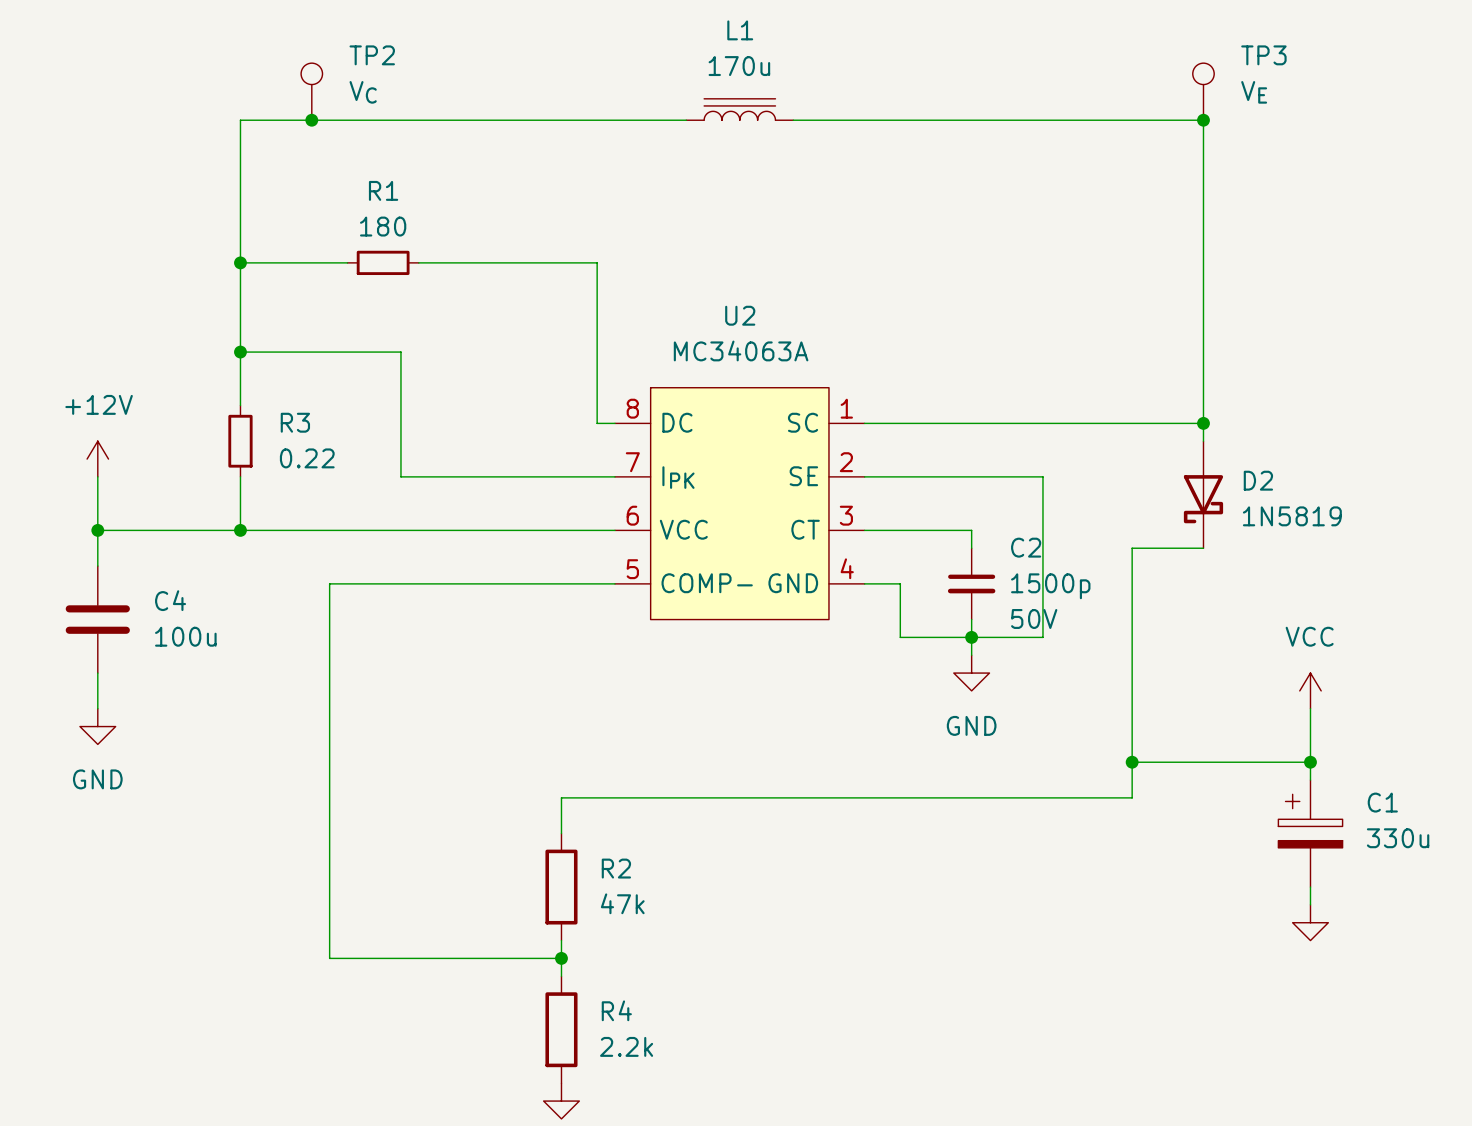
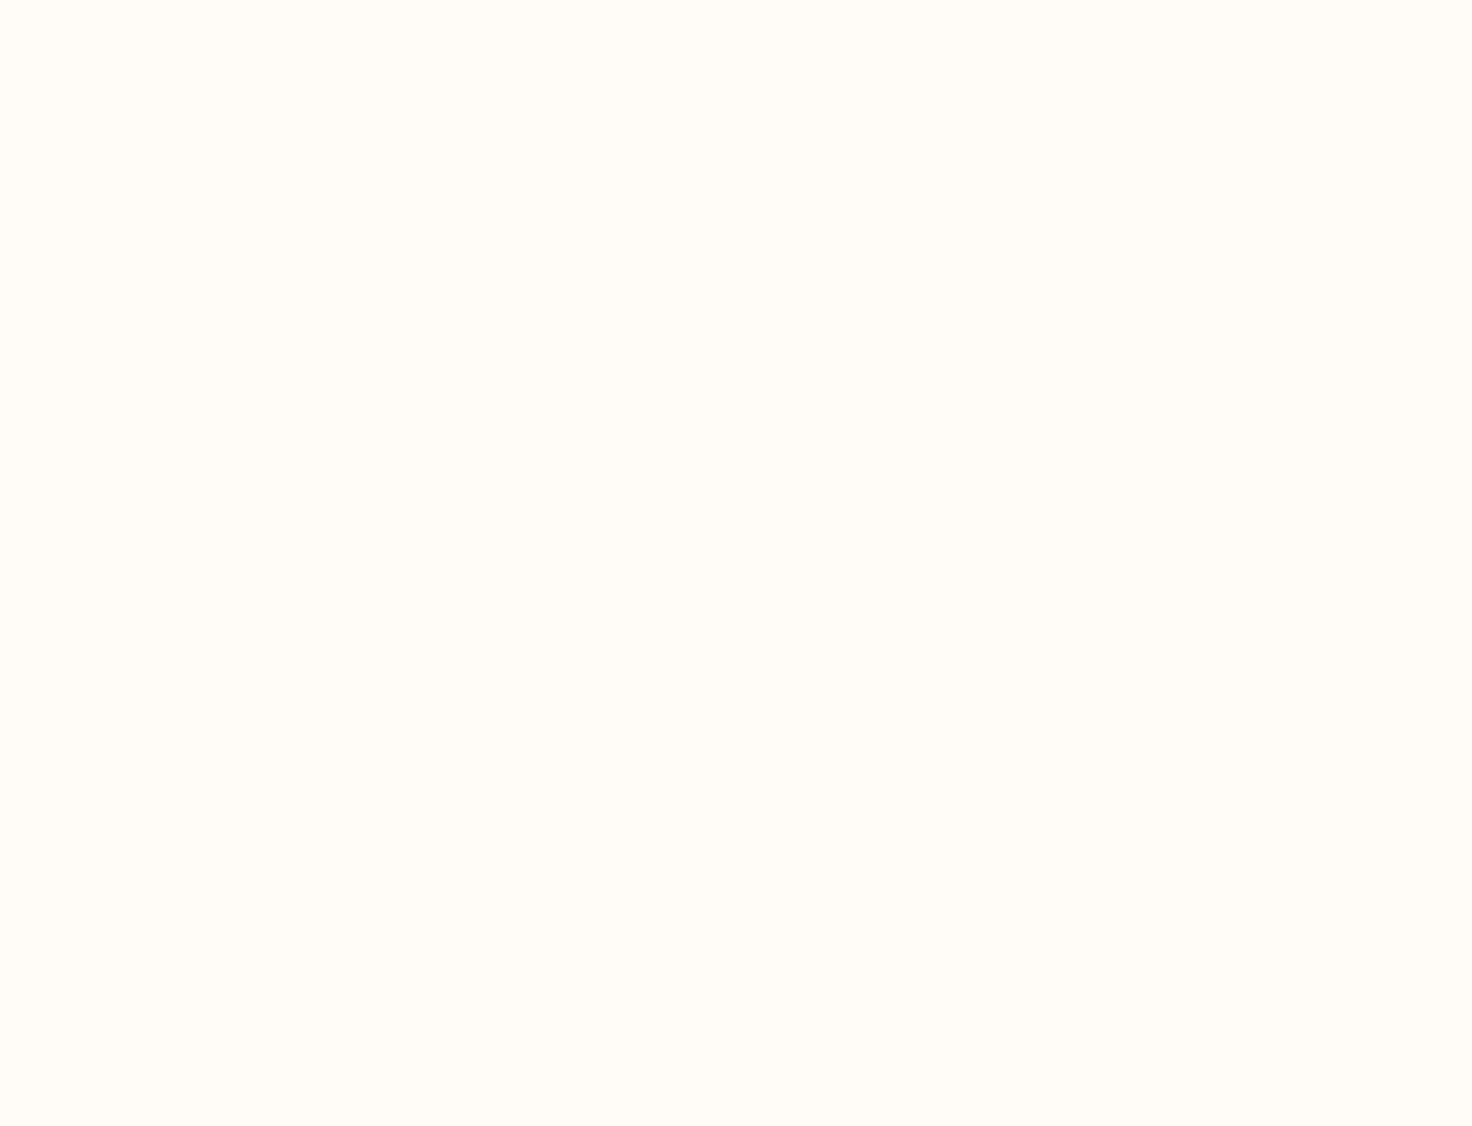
TP2: VC (311, 91) -> none
TP3: VE (1203, 91) -> none
L1: 170u (739, 109) -> none
junction: (311, 120) -> none
wire: (686, 120) (240, 120) (240, 405) -> none
wire: (793, 120) (1203, 120) (1203, 441) -> none
junction: (1203, 120) -> none
wire: (240, 262) (347, 262) -> none
junction: (240, 262) -> none
R1: 180 (383, 262) -> none
wire: (418, 262) (597, 262) (597, 423) (614, 423) -> none
wire: (240, 352) (400, 352) (400, 476) (614, 476) -> none
junction: (240, 352) -> none
wire: (864, 423) (1203, 423) -> none
junction: (1203, 423) -> none
R3: 0.22 (240, 441) -> none
power symbol: +12V (97, 459) -> none
wire: (97, 476) (97, 566) -> none
wire: (240, 476) (240, 530) -> none
wire: (864, 476) (1042, 476) (1042, 637) (900, 637) (900, 583) (864, 583) -> none
D2: 1N5819 (1203, 494) -> none
U2: MC34063A (739, 503) -> none
wire: (97, 530) (614, 530) -> none
junction: (97, 530) -> none
junction: (240, 530) -> none
wire: (864, 530) (971, 530) (971, 548) -> none
wire: (1203, 548) (1132, 548) (1132, 797) (561, 797) (561, 833) -> none
wire: (614, 583) (329, 583) (329, 958) (561, 958) -> none
C2: 1500p (971, 583) -> none
C4: 100u (97, 619) -> none
wire: (971, 619) (971, 655) -> none
junction: (971, 637) -> none
wire: (97, 673) (97, 708) -> none
power symbol: GND (971, 673) -> none
power symbol: VCC (1310, 690) -> none
wire: (1310, 708) (1310, 780) -> none
power symbol: GND (97, 726) -> none
wire: (1132, 762) (1310, 762) -> none
junction: (1132, 762) -> none
junction: (1310, 762) -> none
C1: 330u (1310, 833) -> none
R2: 47k (561, 887) -> none
wire: (1310, 887) (1310, 904) -> none
power symbol: (1310, 922) -> none
wire: (561, 940) (561, 976) -> none
junction: (561, 958) -> none
R4: 2.2k (561, 1029) -> none
power symbol: (561, 1101) -> none

